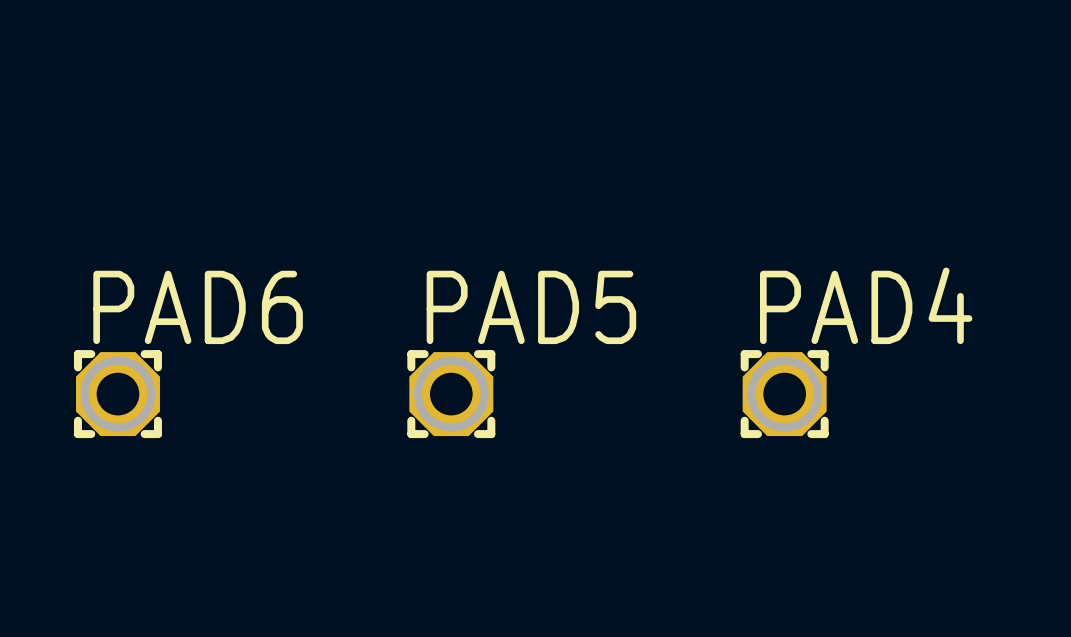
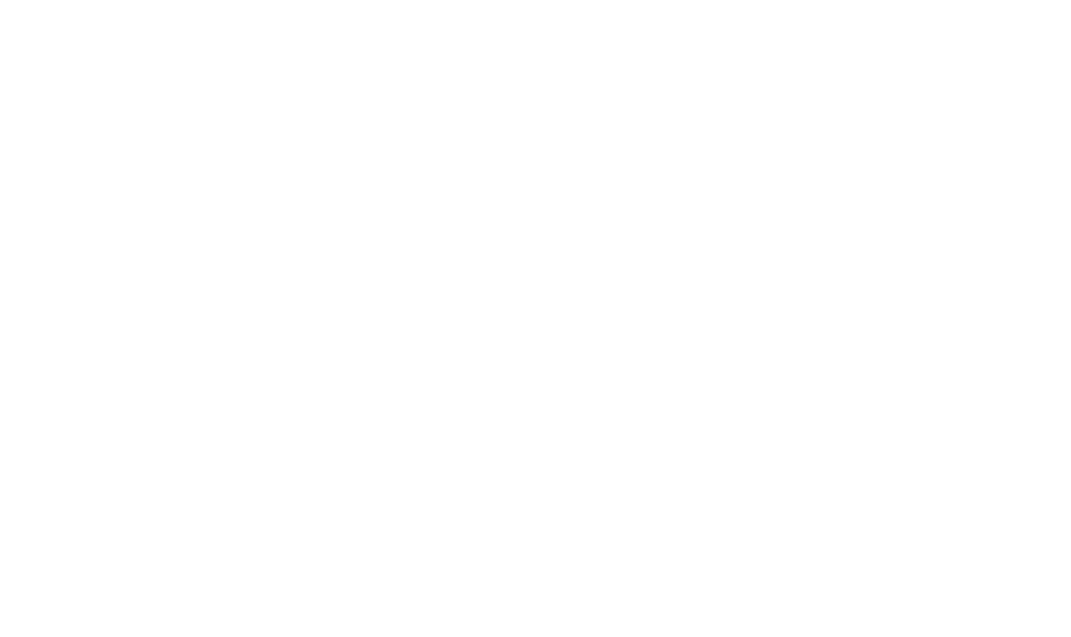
PAD6: (117, 394) -> none
PAD5: (451, 394) -> none
PAD4: (784, 394) -> none

